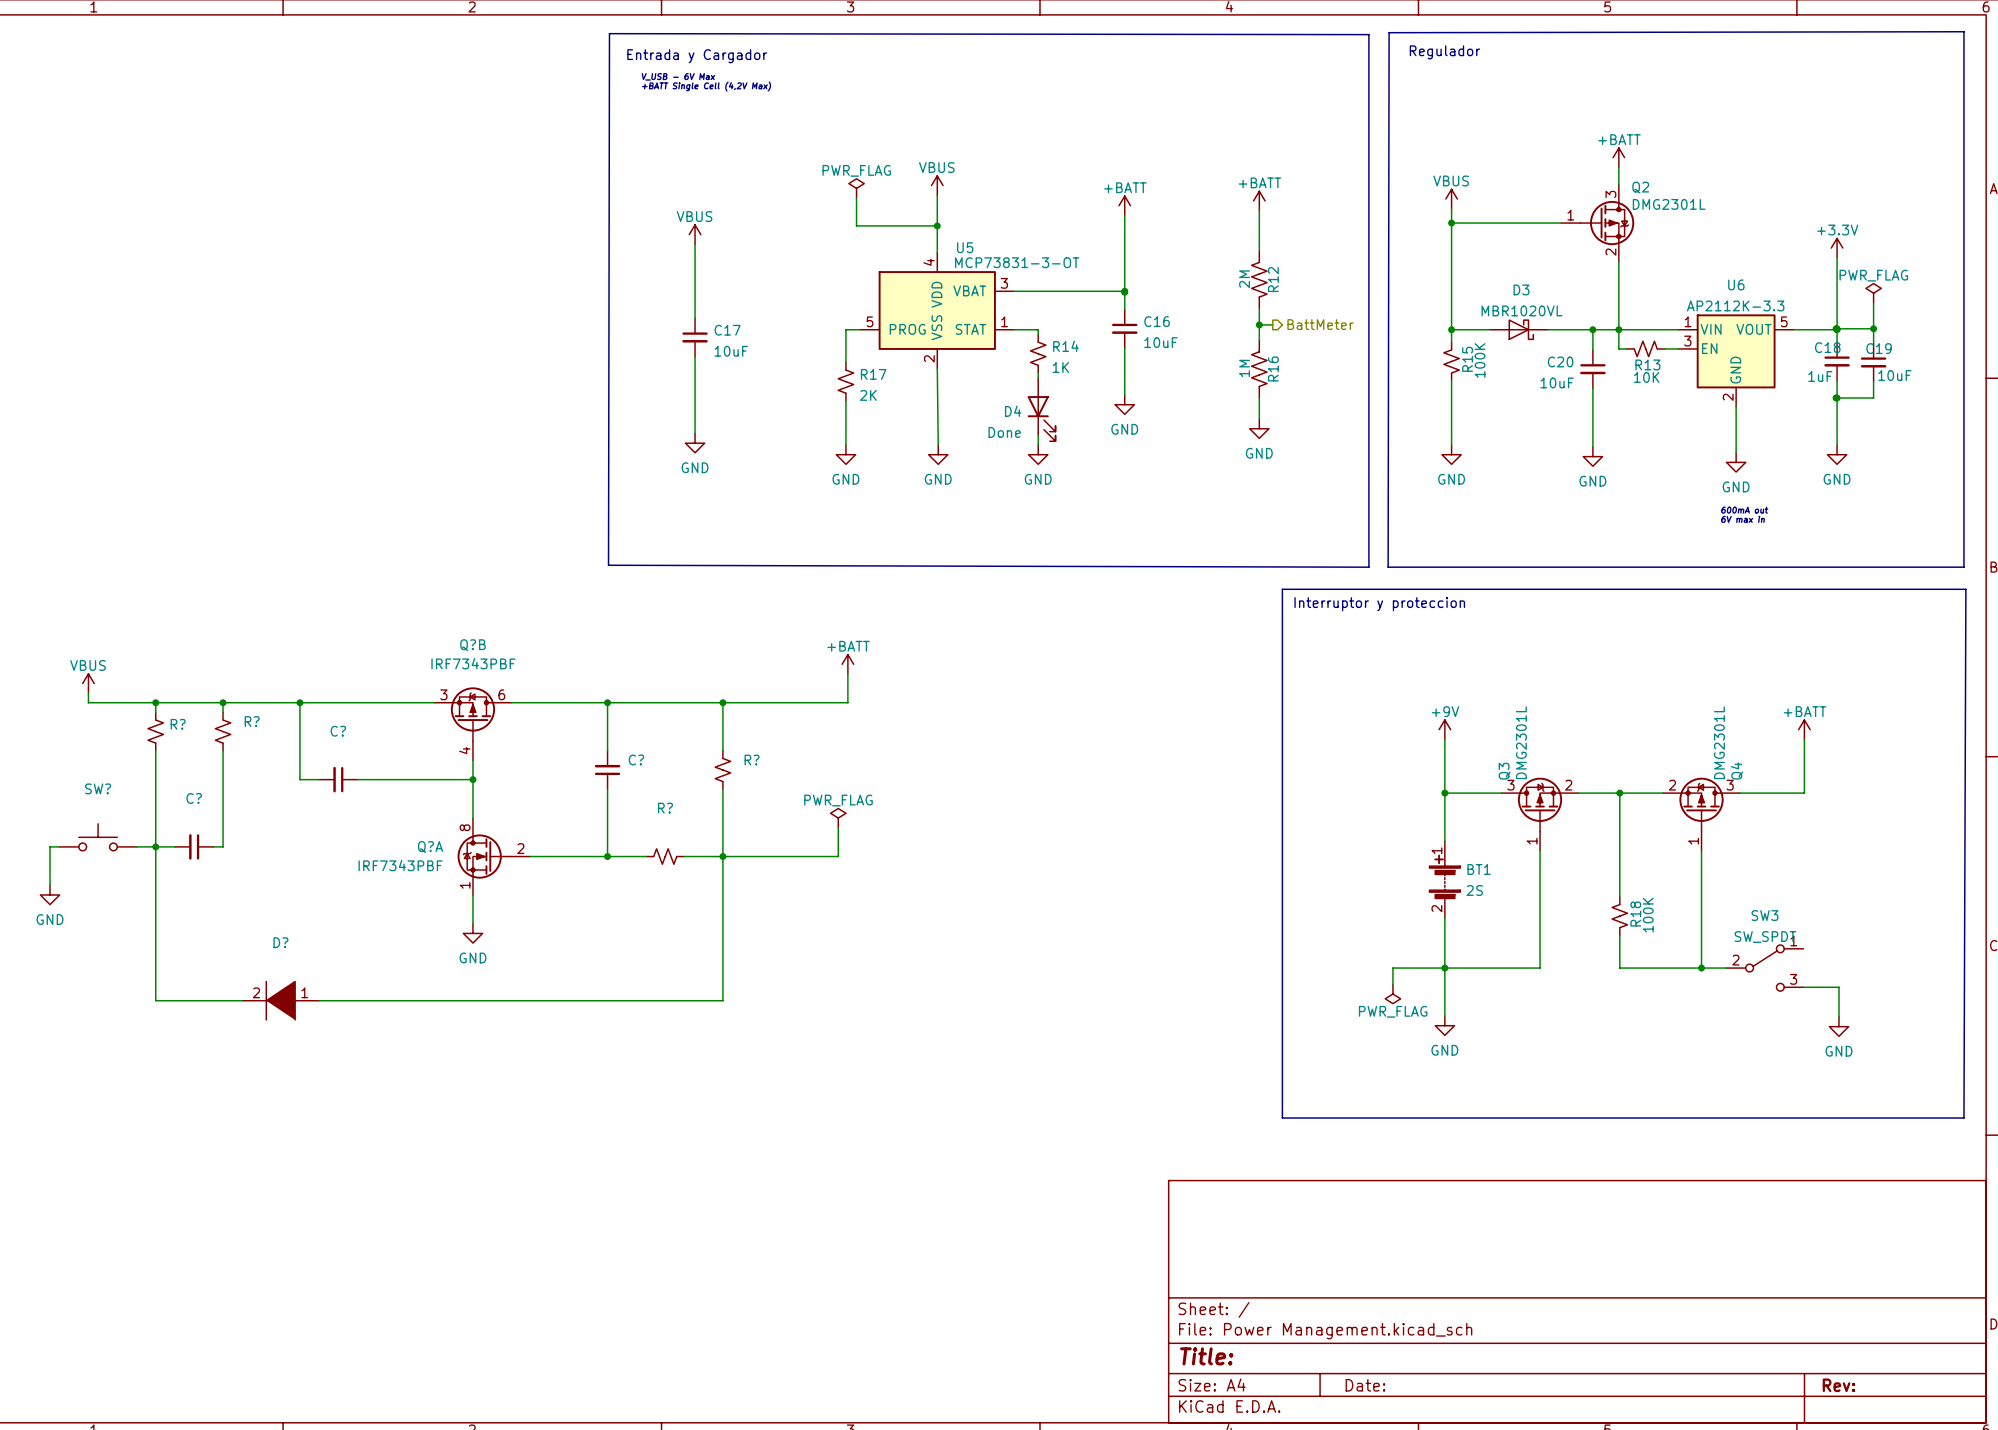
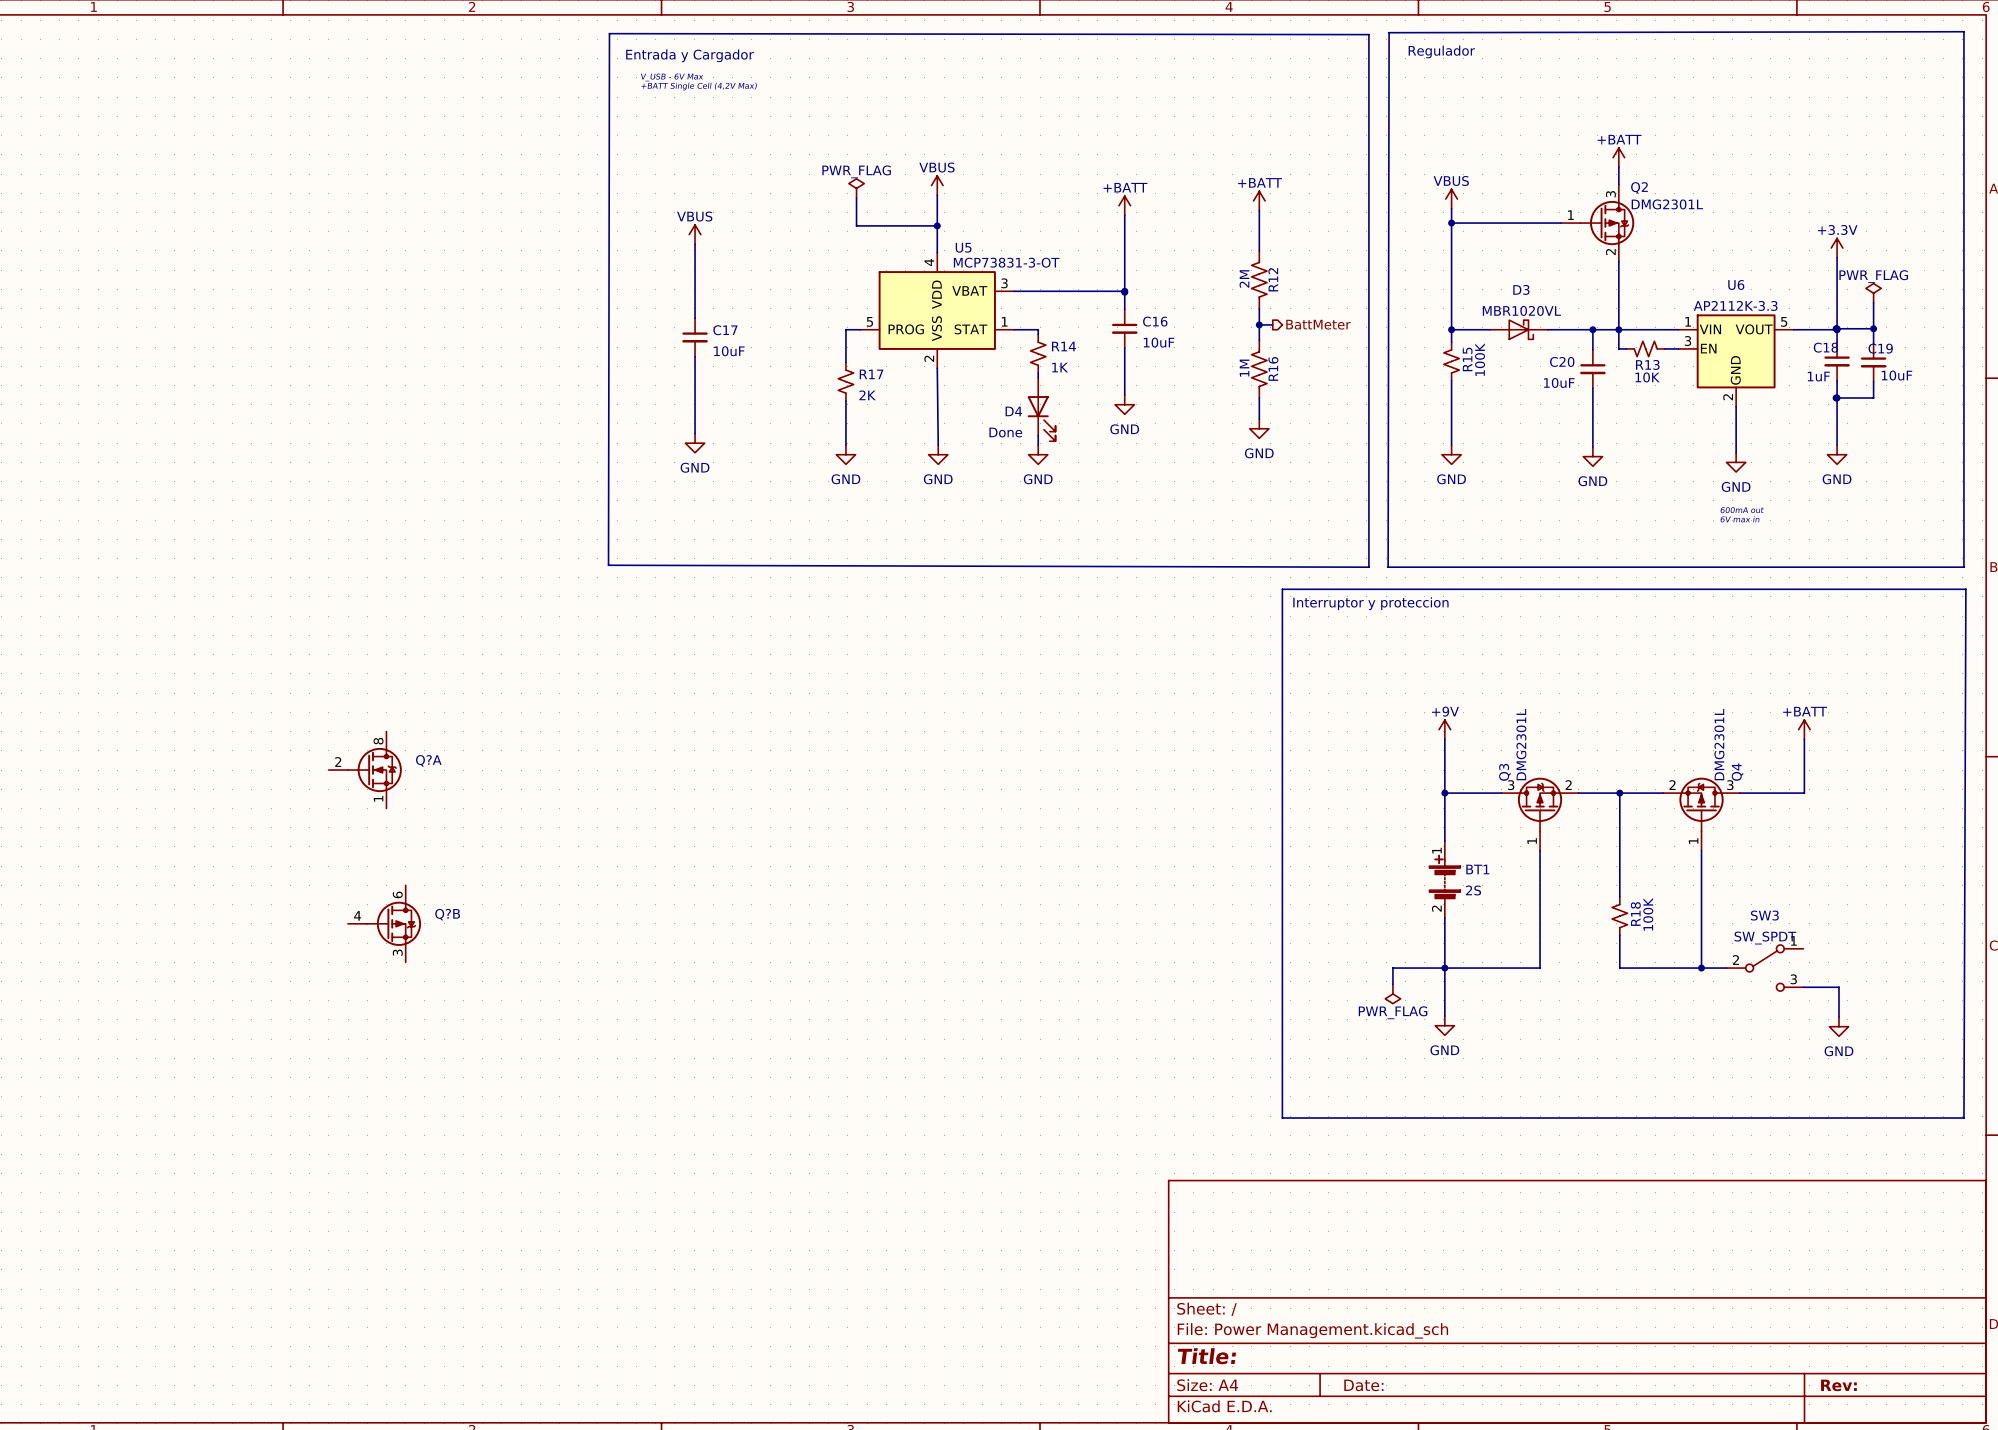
power symbol: +BATT (847, 664) -> none
wire: (847, 673) (847, 702) (511, 702) -> none
power symbol: VBUS (88, 683) -> none
wire: (88, 693) (88, 702) (434, 702) -> none
wire: (155, 702) (155, 712) -> none
junction: (155, 702) -> none
wire: (223, 702) (223, 712) -> none
junction: (223, 702) -> none
wire: (299, 702) (299, 779) (319, 779) -> none
junction: (299, 702) -> none
wire: (607, 702) (607, 750) -> none
junction: (607, 702) -> none
wire: (722, 702) (722, 750) -> none
junction: (722, 702) -> none
Q?B: IRF7343PBF (472, 723) -> none
R?: (155, 731) -> none
R?: (223, 731) -> none
wire: (155, 750) (155, 1000) (242, 1000) -> none
wire: (223, 750) (223, 846) (213, 846) -> none
wire: (472, 760) (472, 818) -> none
Q?A: none -> (365, 770)
C?: (607, 770) -> none
R?: (722, 770) -> none
C?: (338, 779) -> none
wire: (357, 779) (472, 779) -> none
junction: (472, 779) -> none
wire: (607, 789) (607, 856) -> none
wire: (722, 789) (722, 1000) (319, 1000) -> none
power symbol: PWR_FLAG (838, 818) -> none
wire: (838, 827) (838, 856) (684, 856) -> none
SW?: (98, 837) -> none
wire: (59, 846) (50, 846) (50, 885) -> none
wire: (136, 846) (174, 846) -> none
junction: (155, 846) -> none
C?: (194, 846) -> none
Q?A: IRF7343PBF (494, 856) -> none
wire: (530, 856) (646, 856) -> none
junction: (607, 856) -> none
R?: (665, 856) -> none
junction: (722, 856) -> none
power symbol: GND (50, 894) -> none
wire: (472, 894) (472, 923) -> none
Q?B: none -> (384, 923)
power symbol: GND (472, 933) -> none
D?: (280, 1000) -> none

